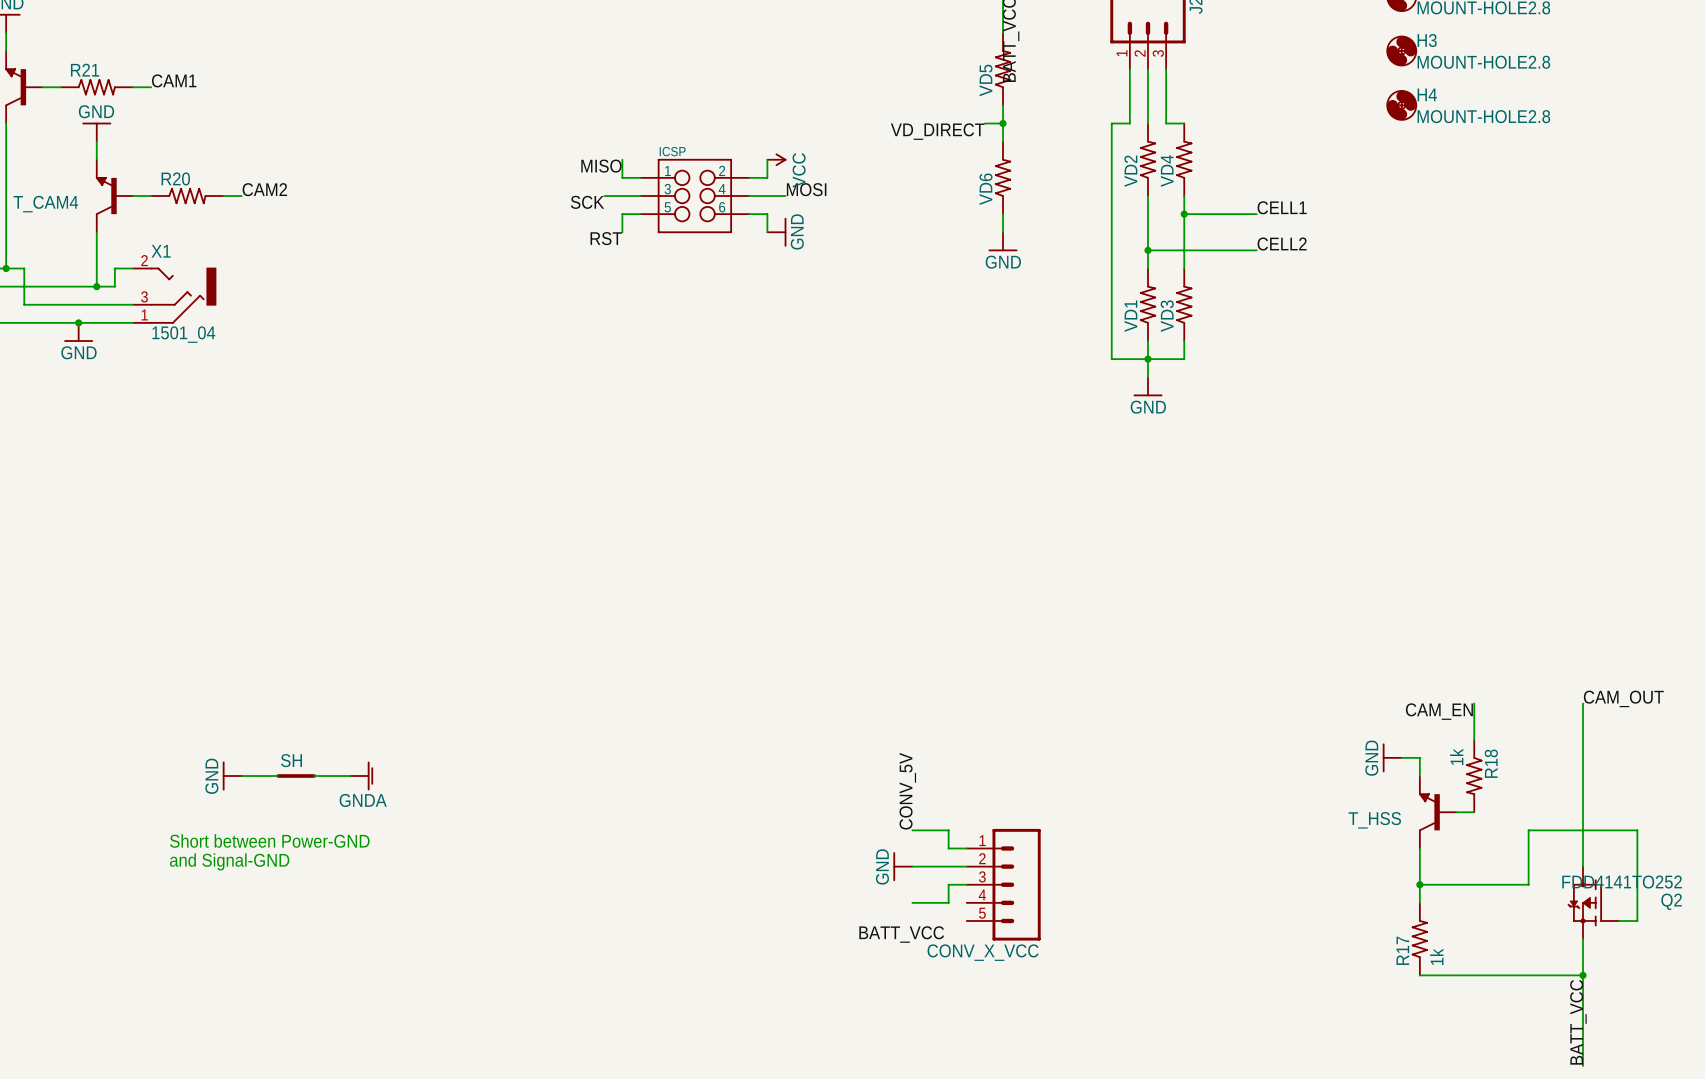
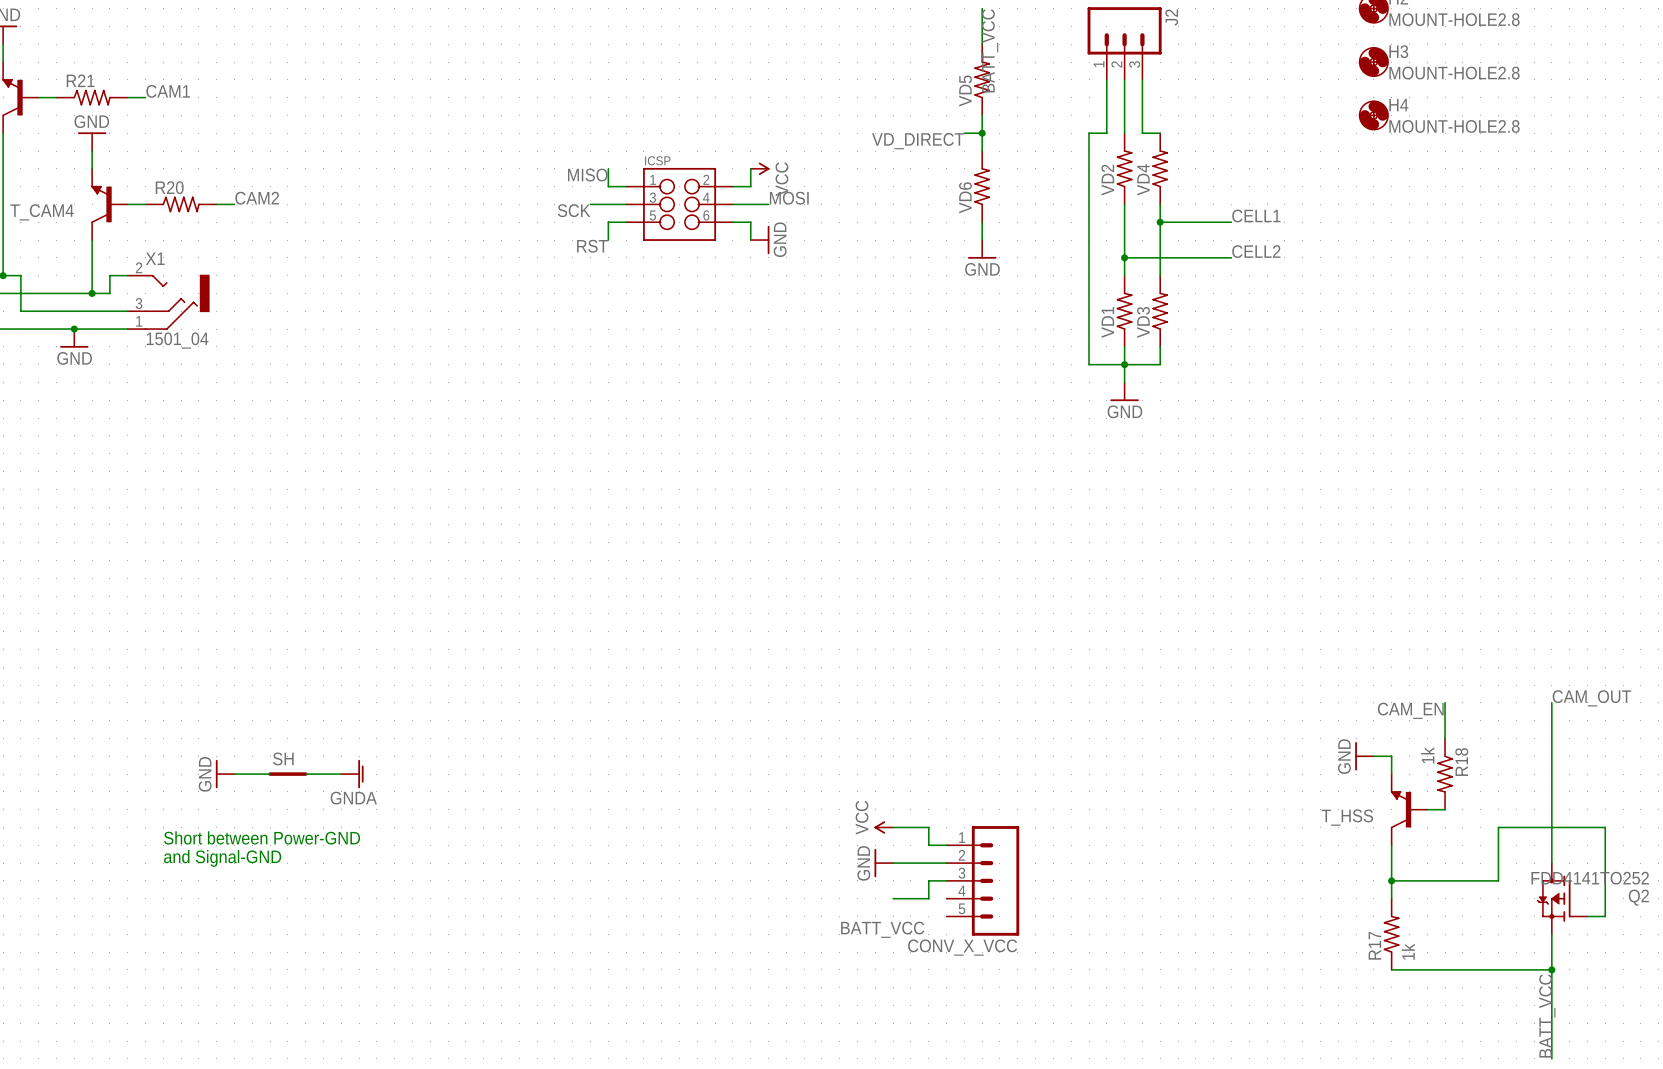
label: CONV_5V (907, 791) -> none
power symbol: none -> VCC (883, 827)

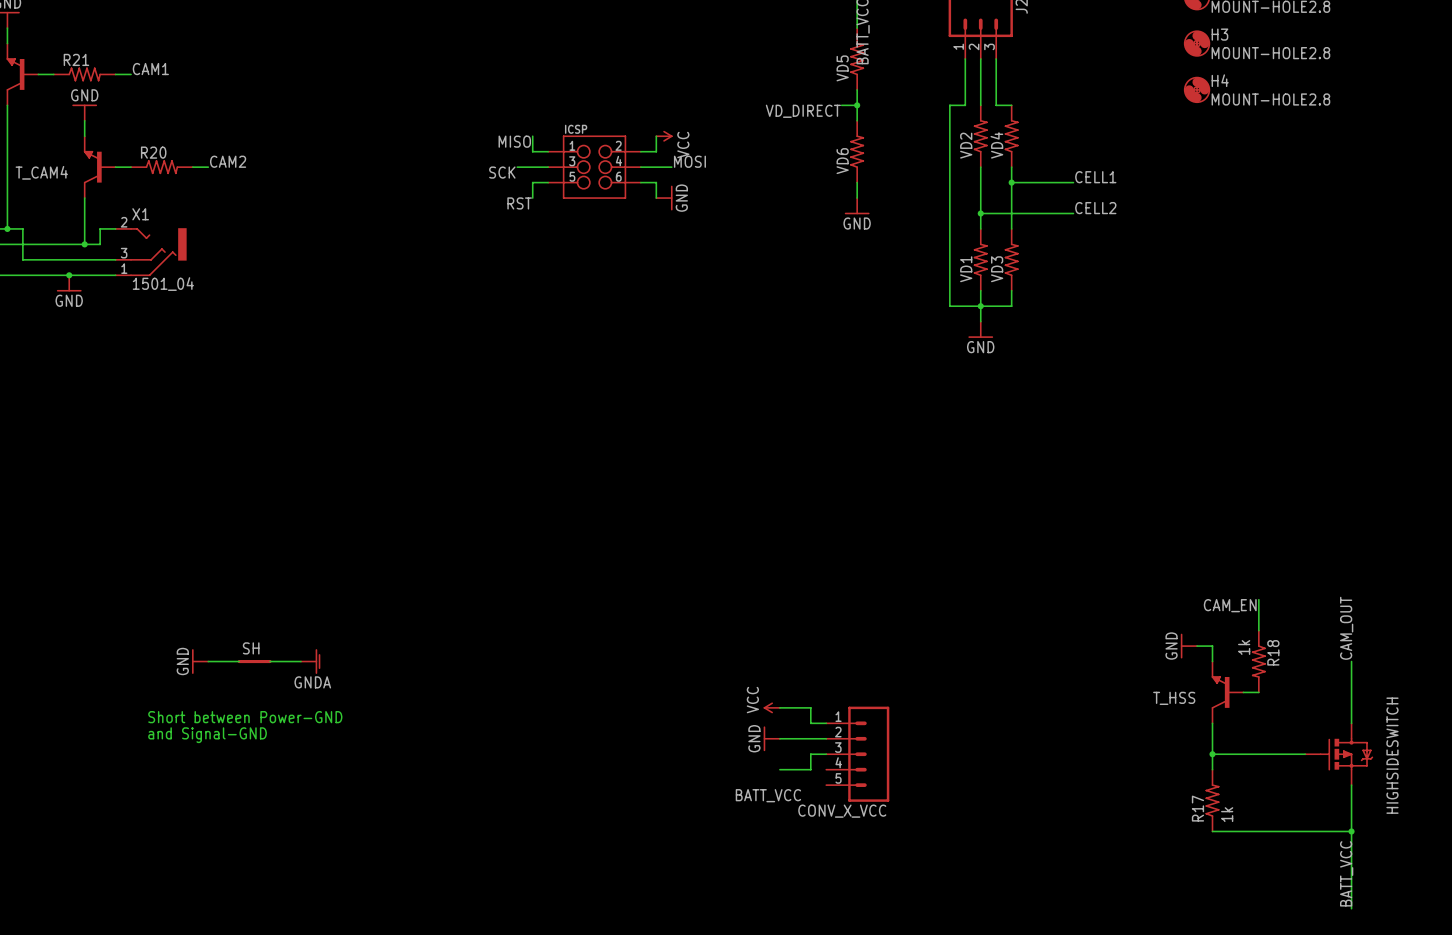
label rotation: 0° (1591, 698) -> 90° counterclockwise (1346, 628)
wire: (1551, 702) (1551, 774) -> none
wire: (1498, 880) (1498, 827) (1605, 827) (1605, 916) (1587, 916) -> none
HIGHSIDESWITCH: none -> (1339, 754)
Q2: FDD4141TO252 (1562, 898) -> none

